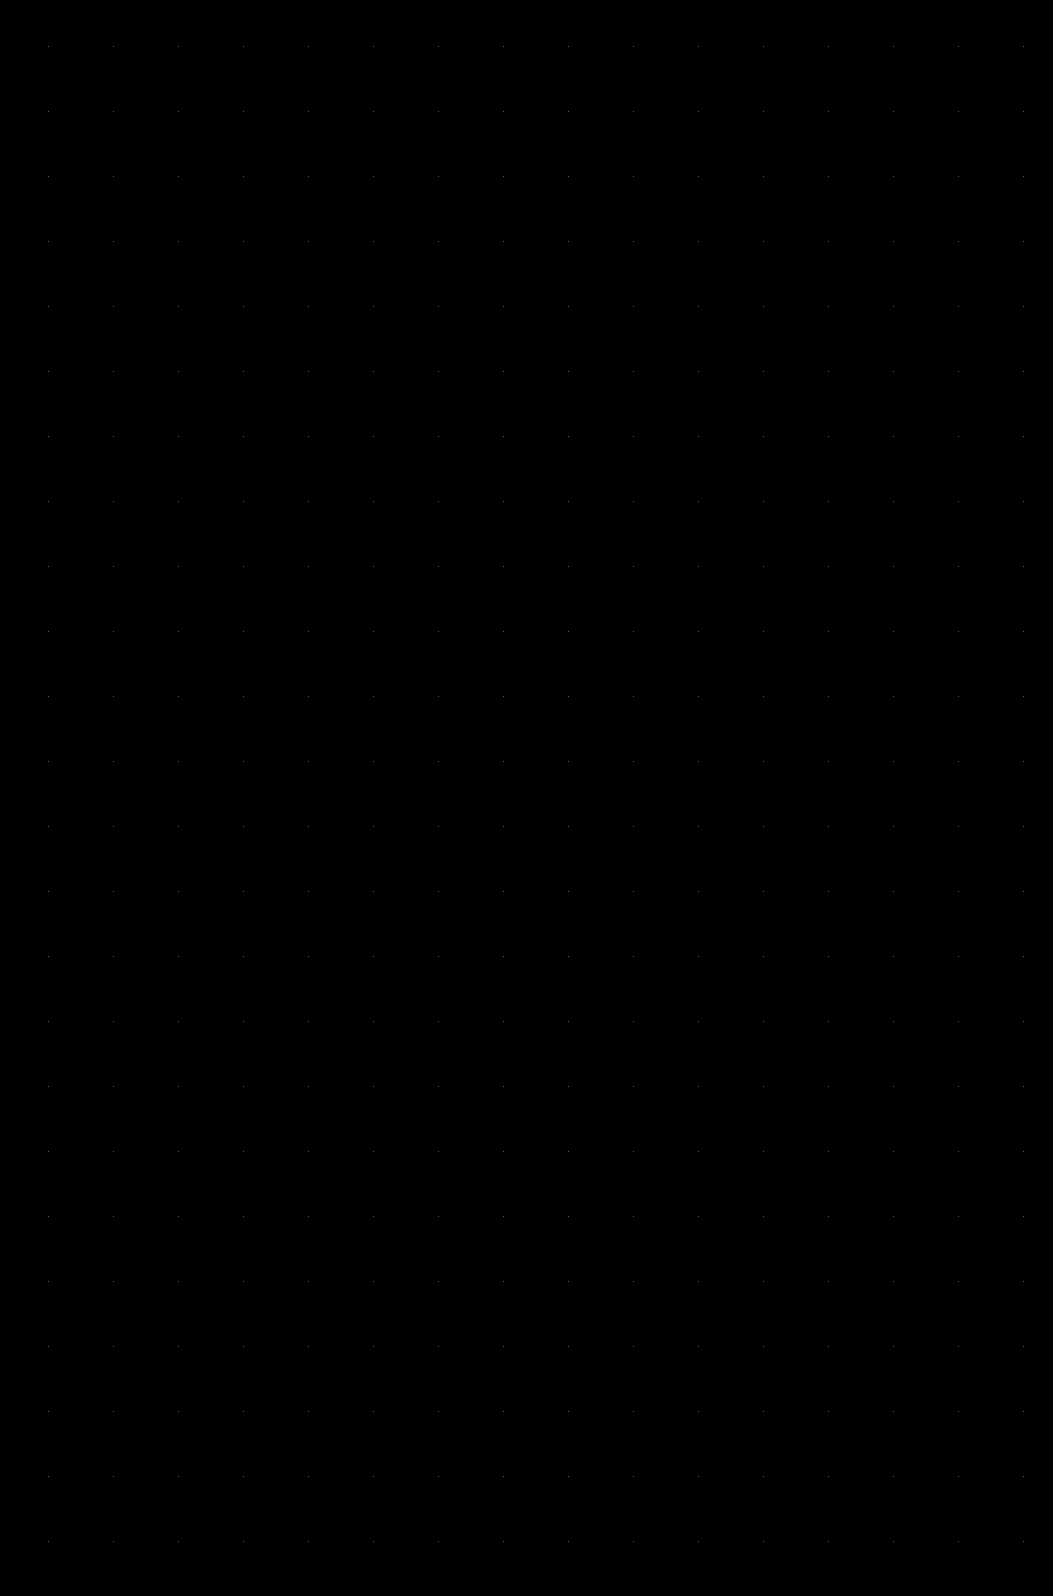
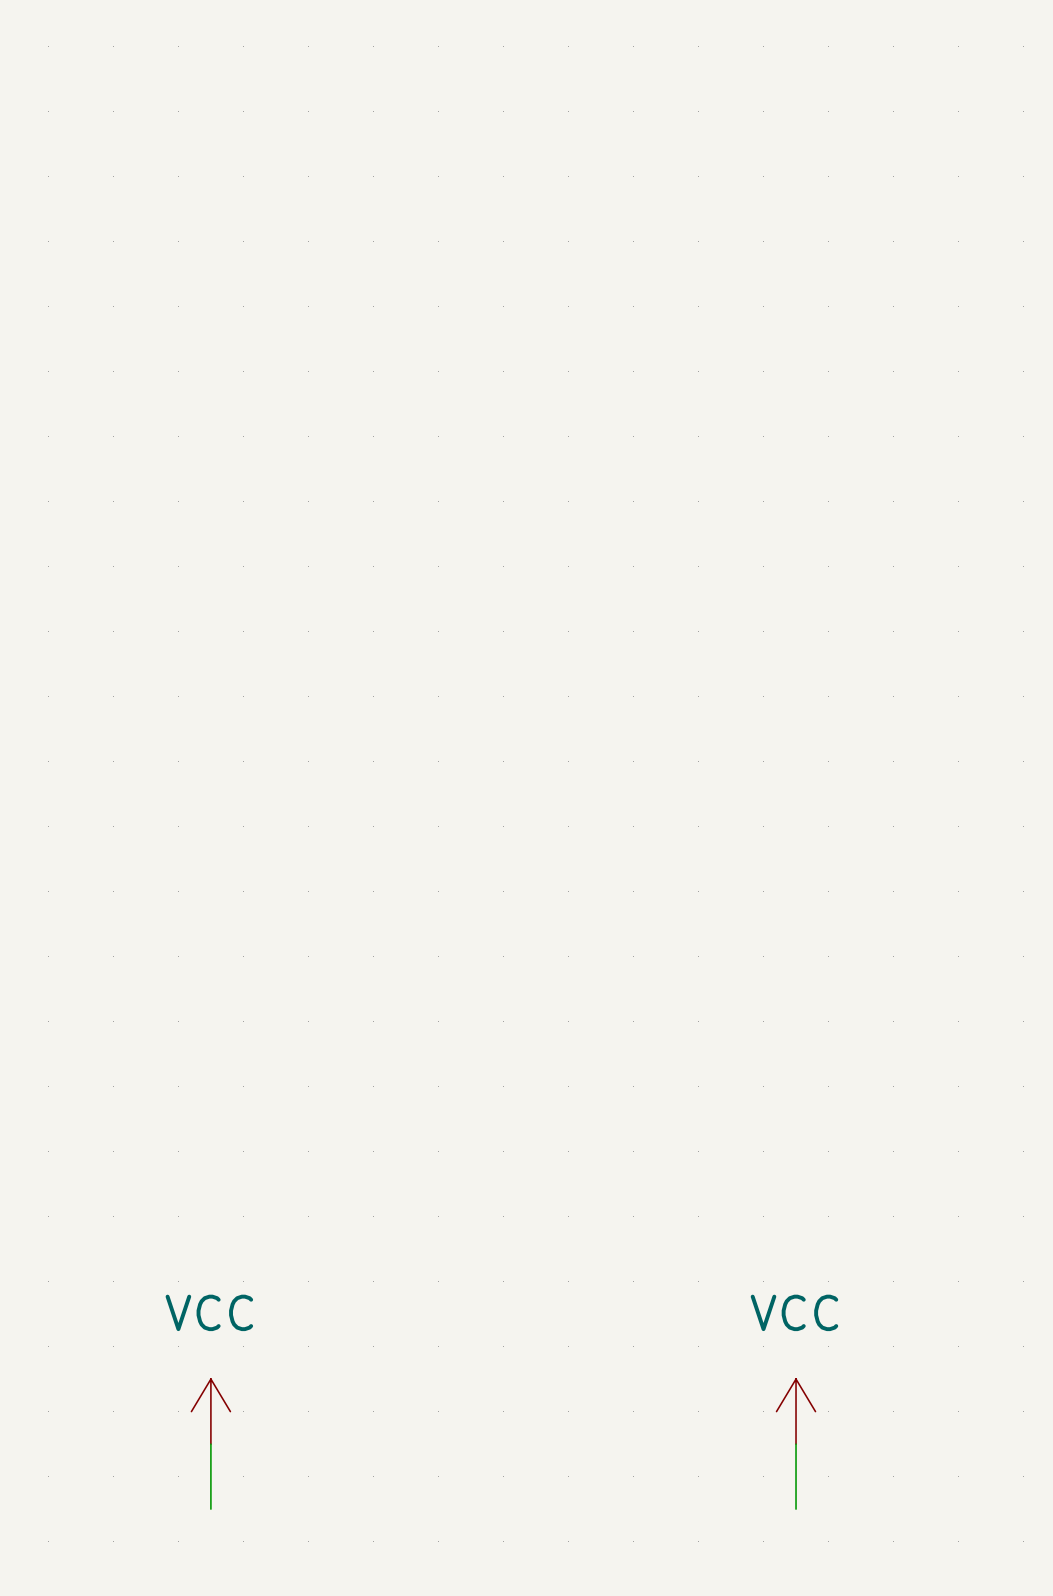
power symbol: none -> VCC (210, 1411)
power symbol: none -> VCC (796, 1411)
wire: none -> (210, 1444) (210, 1509)
wire: none -> (796, 1444) (796, 1509)

